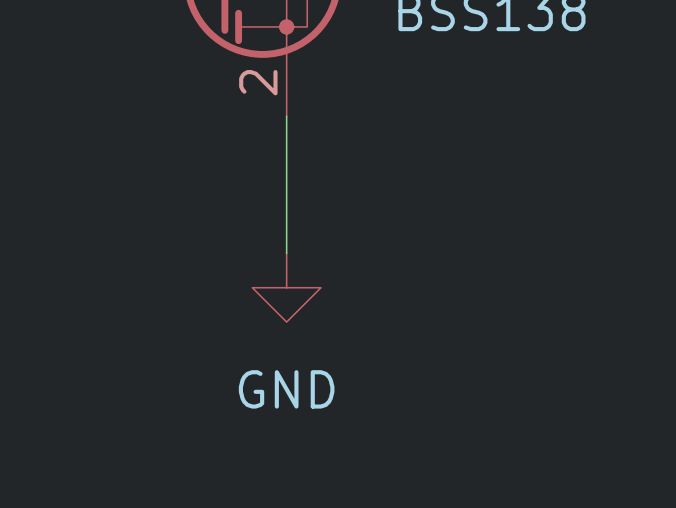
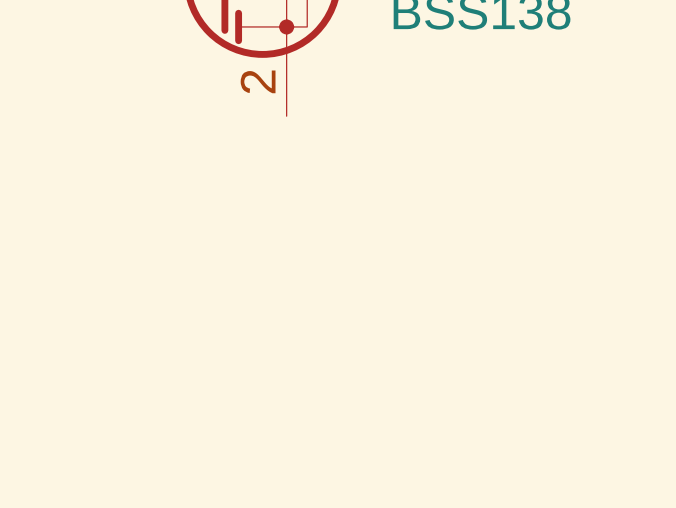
wire: (286, 116) (286, 253) -> none
power symbol: GND (286, 287) -> none

